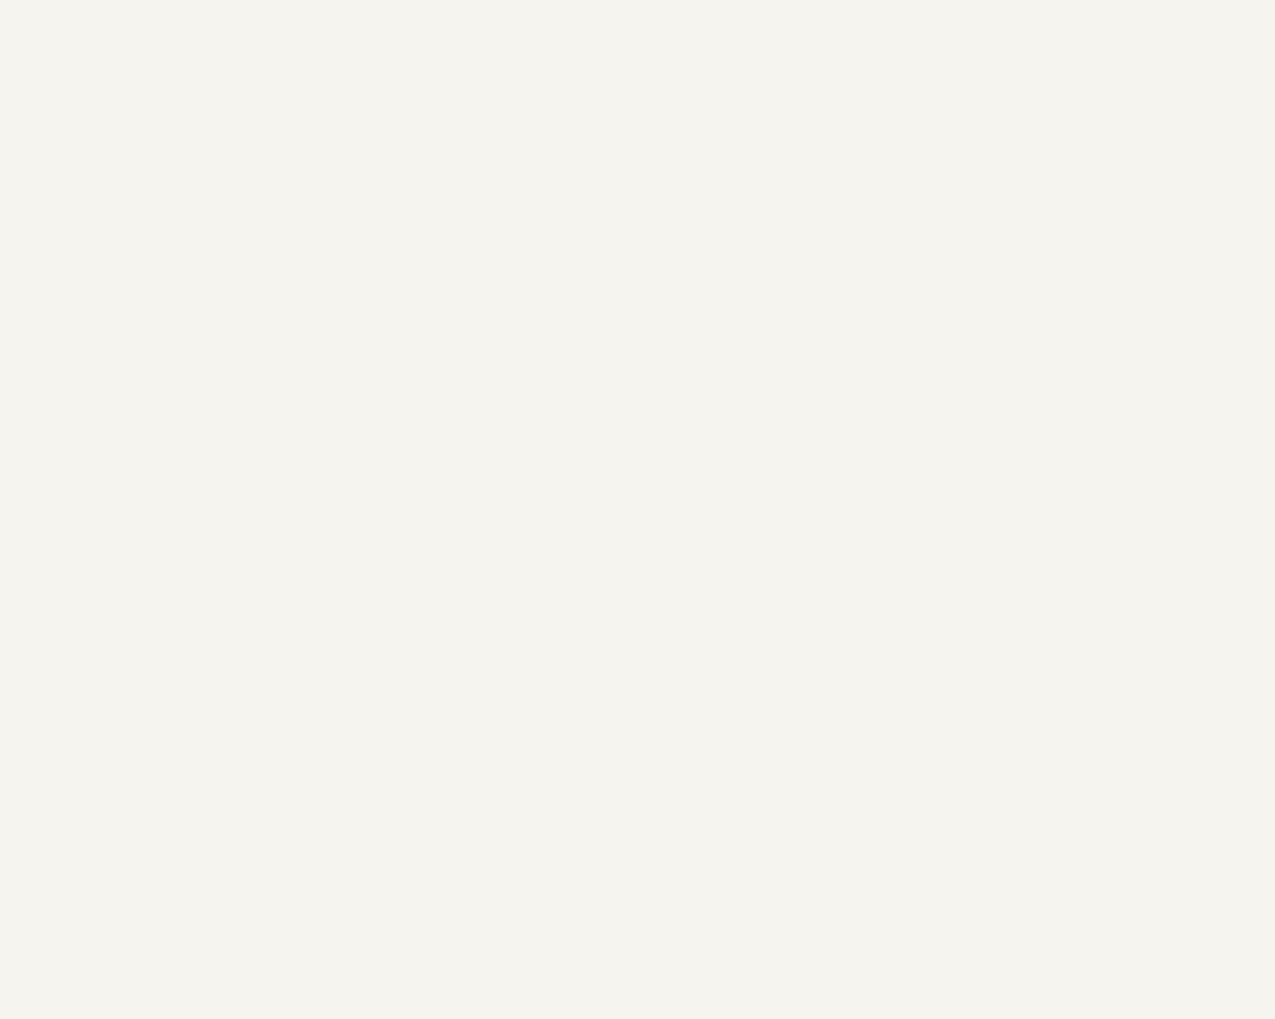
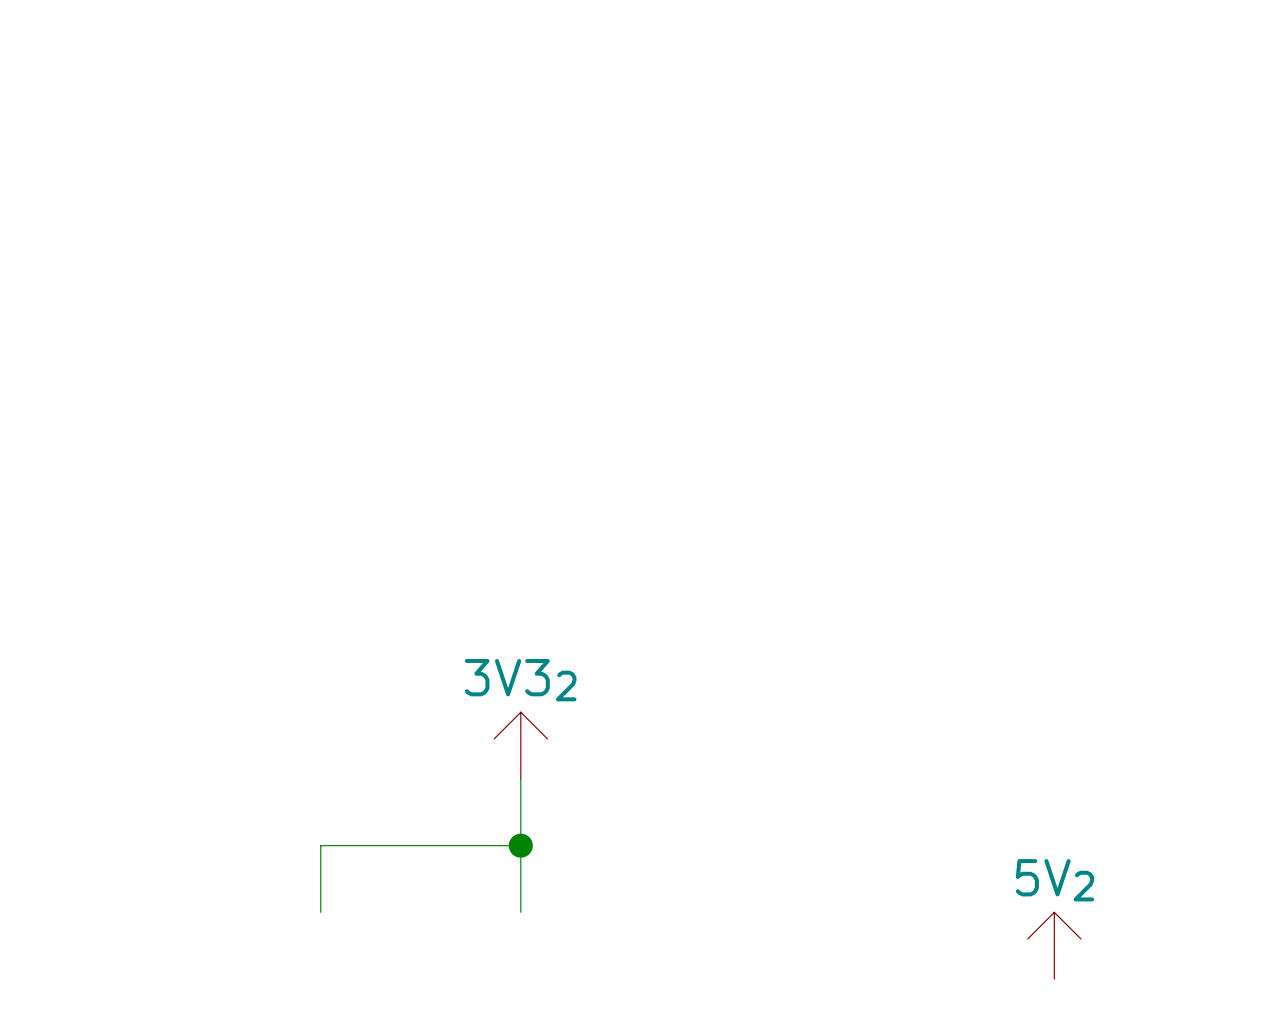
power symbol: none -> 3V32 (520, 745)
wire: none -> (520, 778) (520, 912)
wire: none -> (520, 845) (320, 845) (320, 912)
junction: none -> (520, 845)
power symbol: none -> 5V2 (1054, 945)

